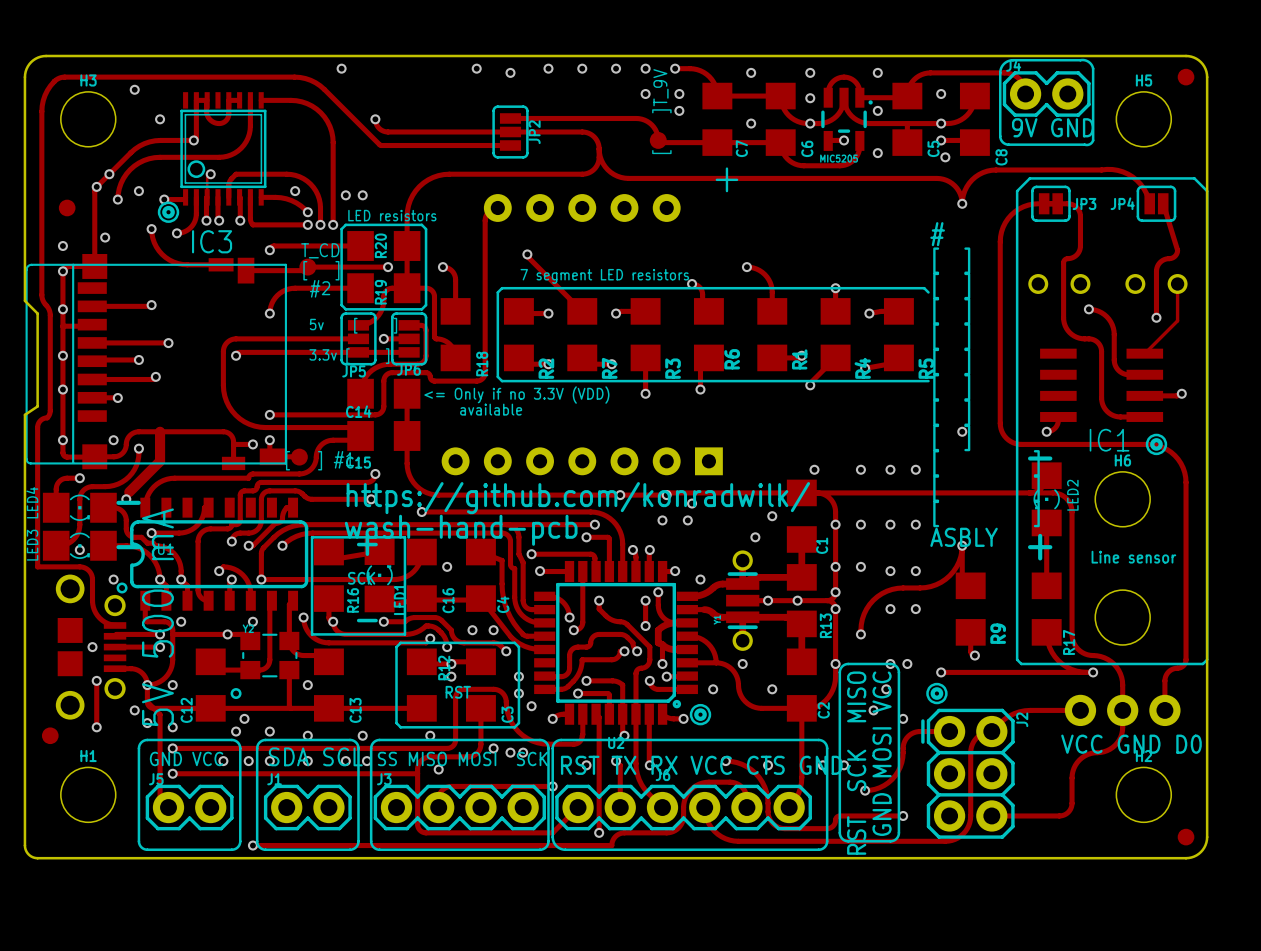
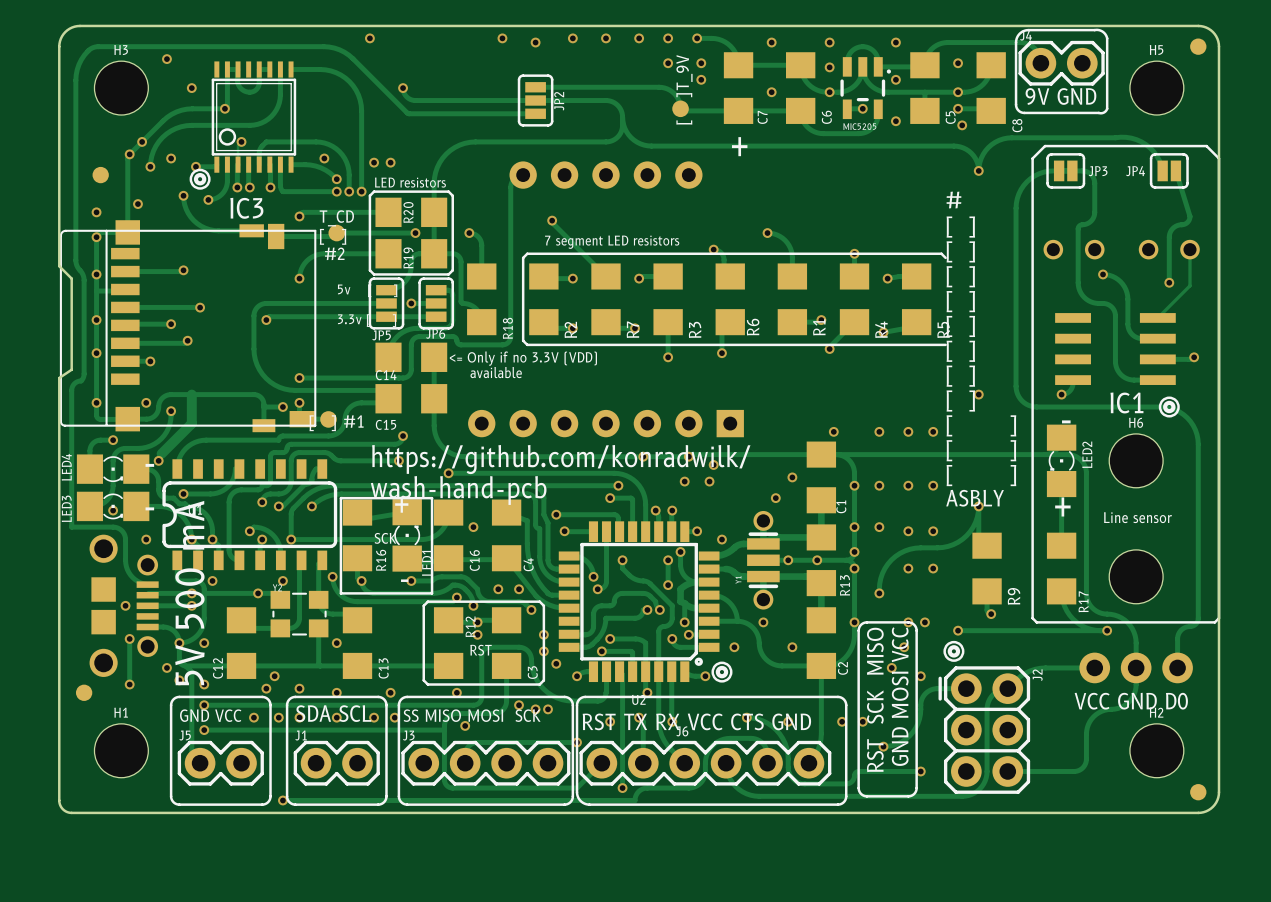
drawing: [116, 582, 128, 594] -> none
drawing: [230, 688, 242, 700] -> none

